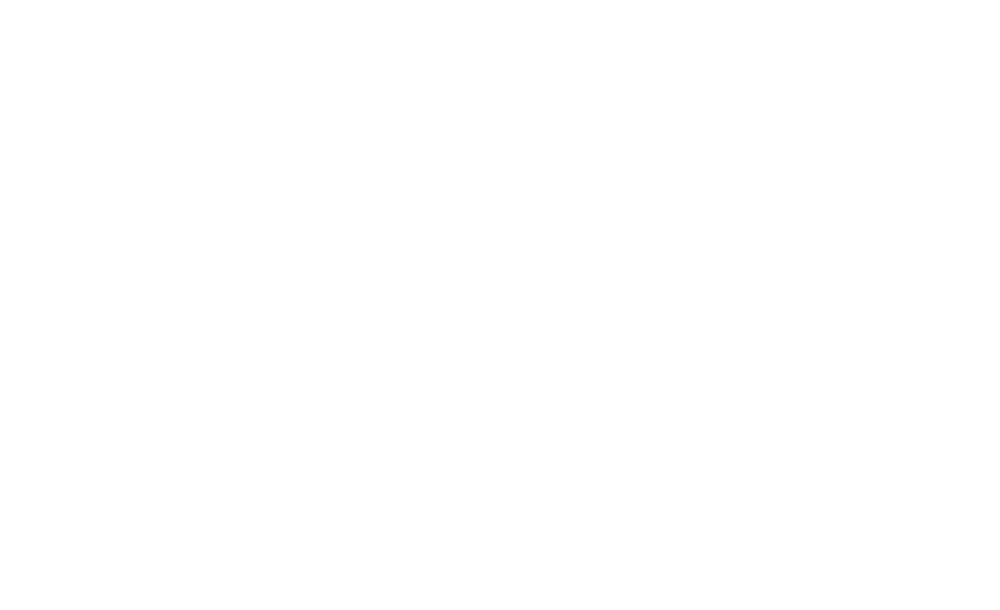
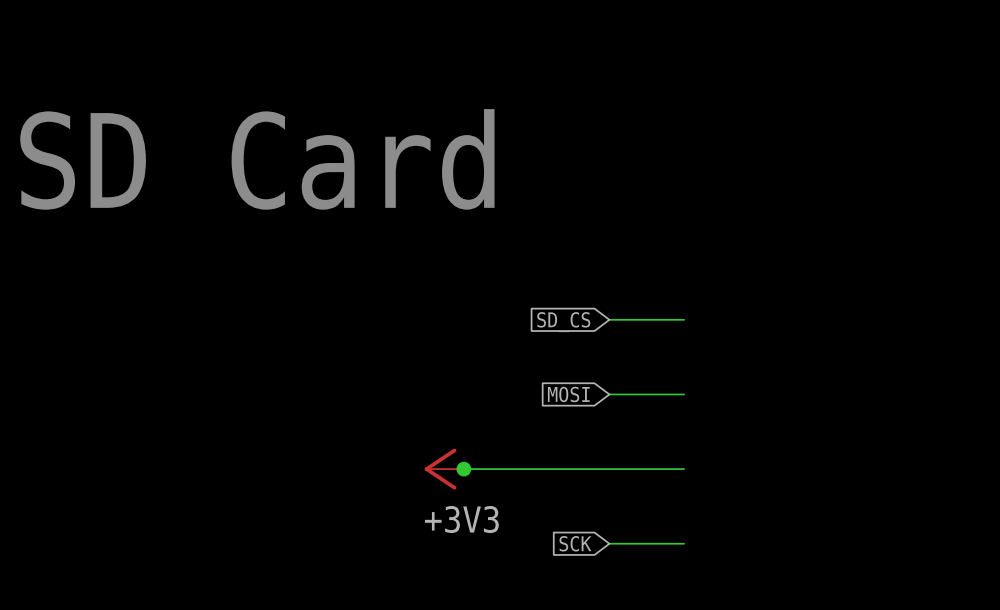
text: none -> SD Card (257, 159)
wire: none -> (609, 319) (684, 319)
global label: none -> SD_CS (563, 322)
global label: none -> MOSI (568, 394)
wire: none -> (609, 394) (684, 394)
power symbol: none -> +3V3 (444, 469)
wire: none -> (463, 469) (684, 469)
junction: none -> (463, 469)
global label: none -> SCK (575, 543)
wire: none -> (609, 543) (684, 543)

